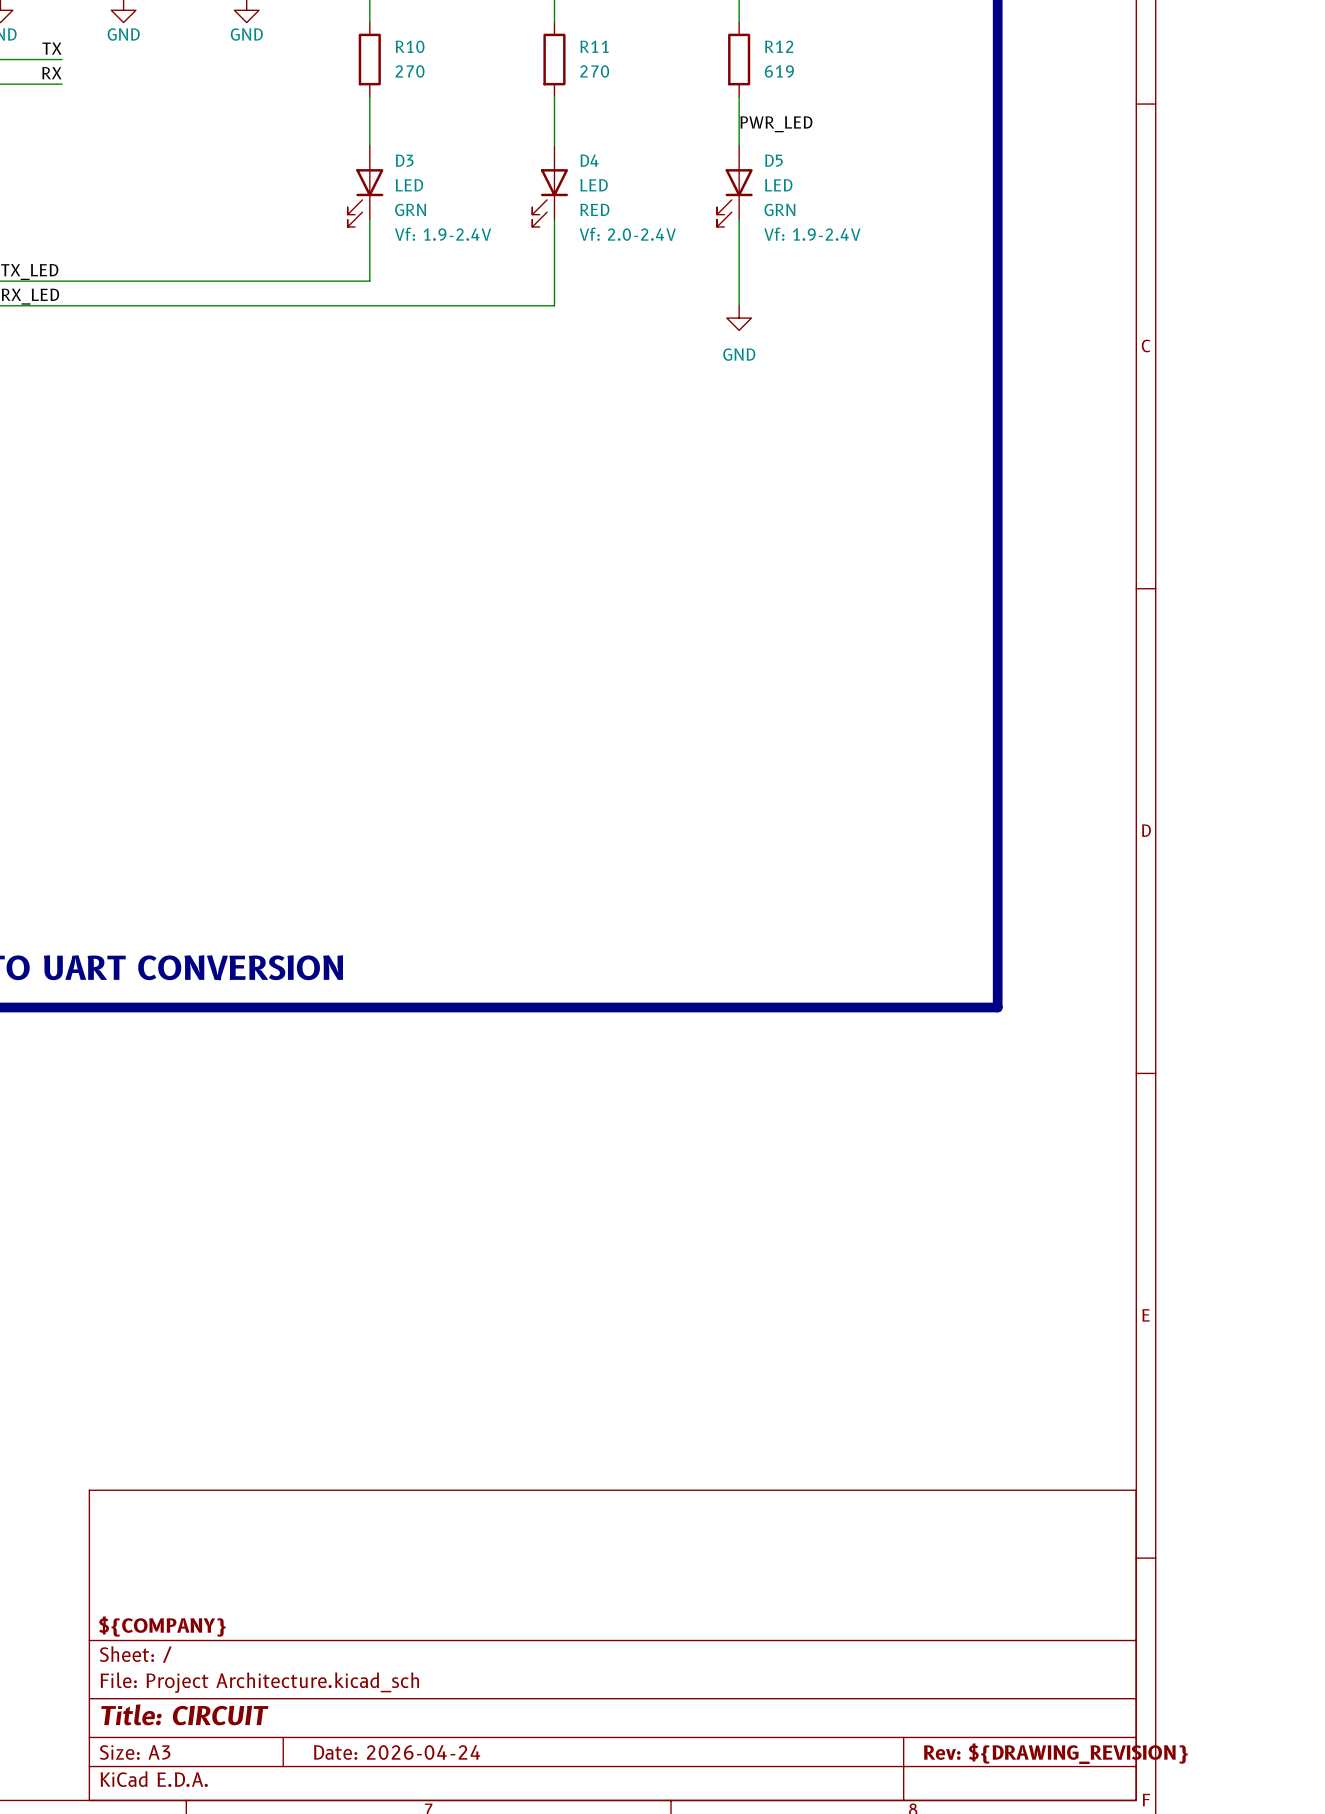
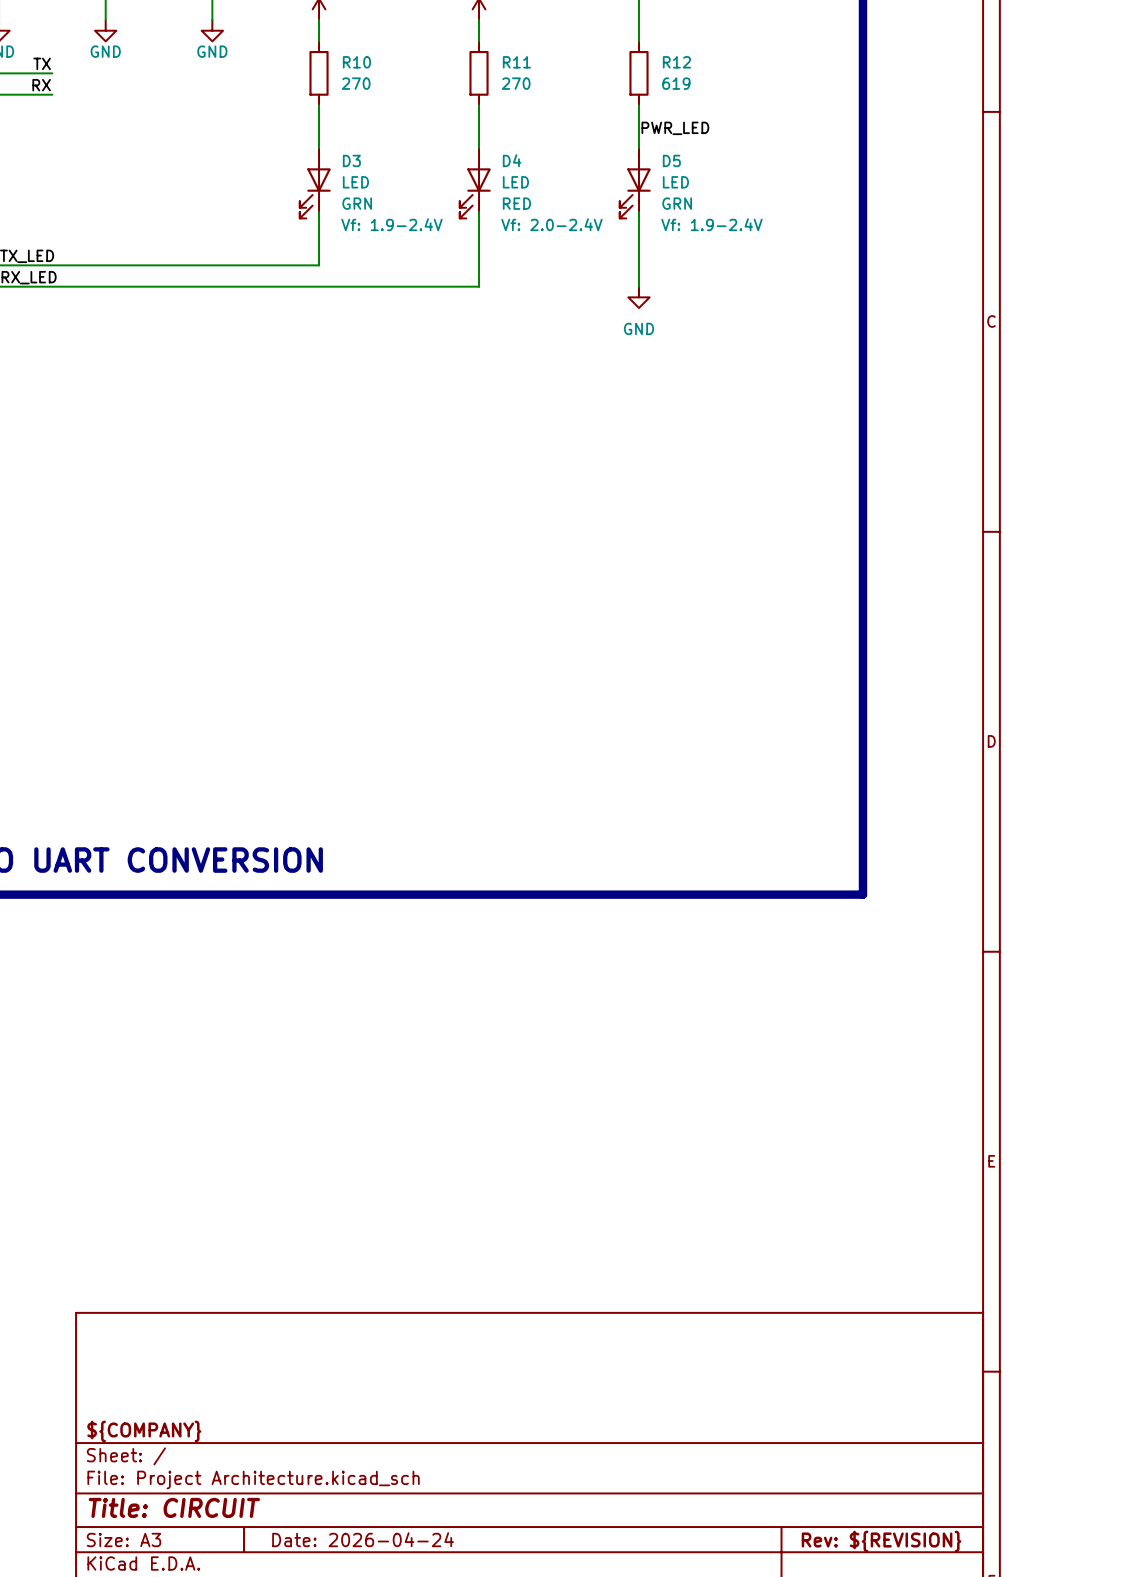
title block: Rev: ${DRAWING_REVISION} (1055, 1753) -> Rev: ${REVISION} (881, 1541)

